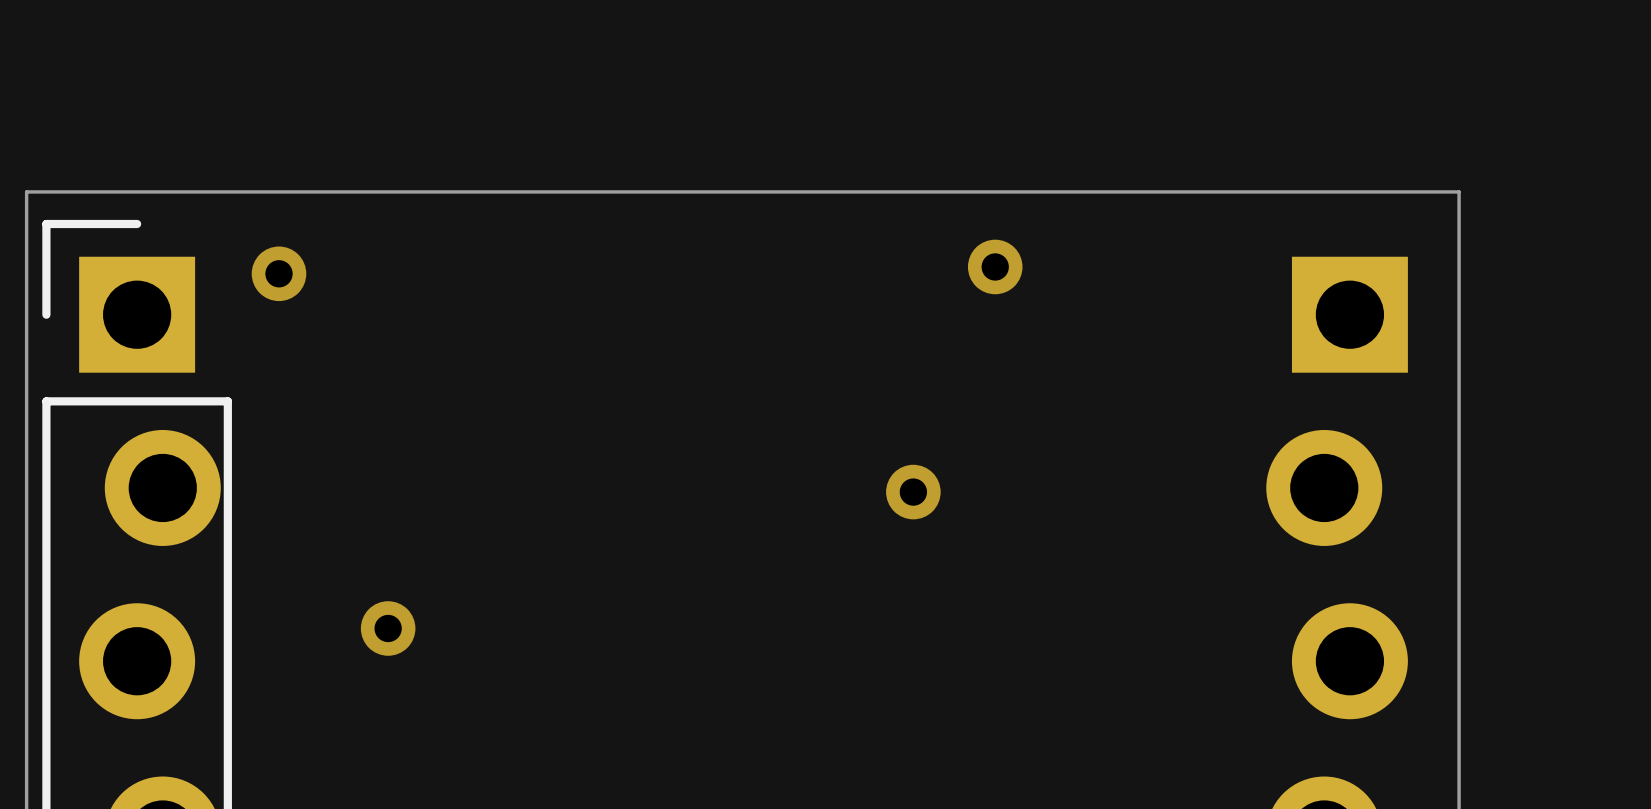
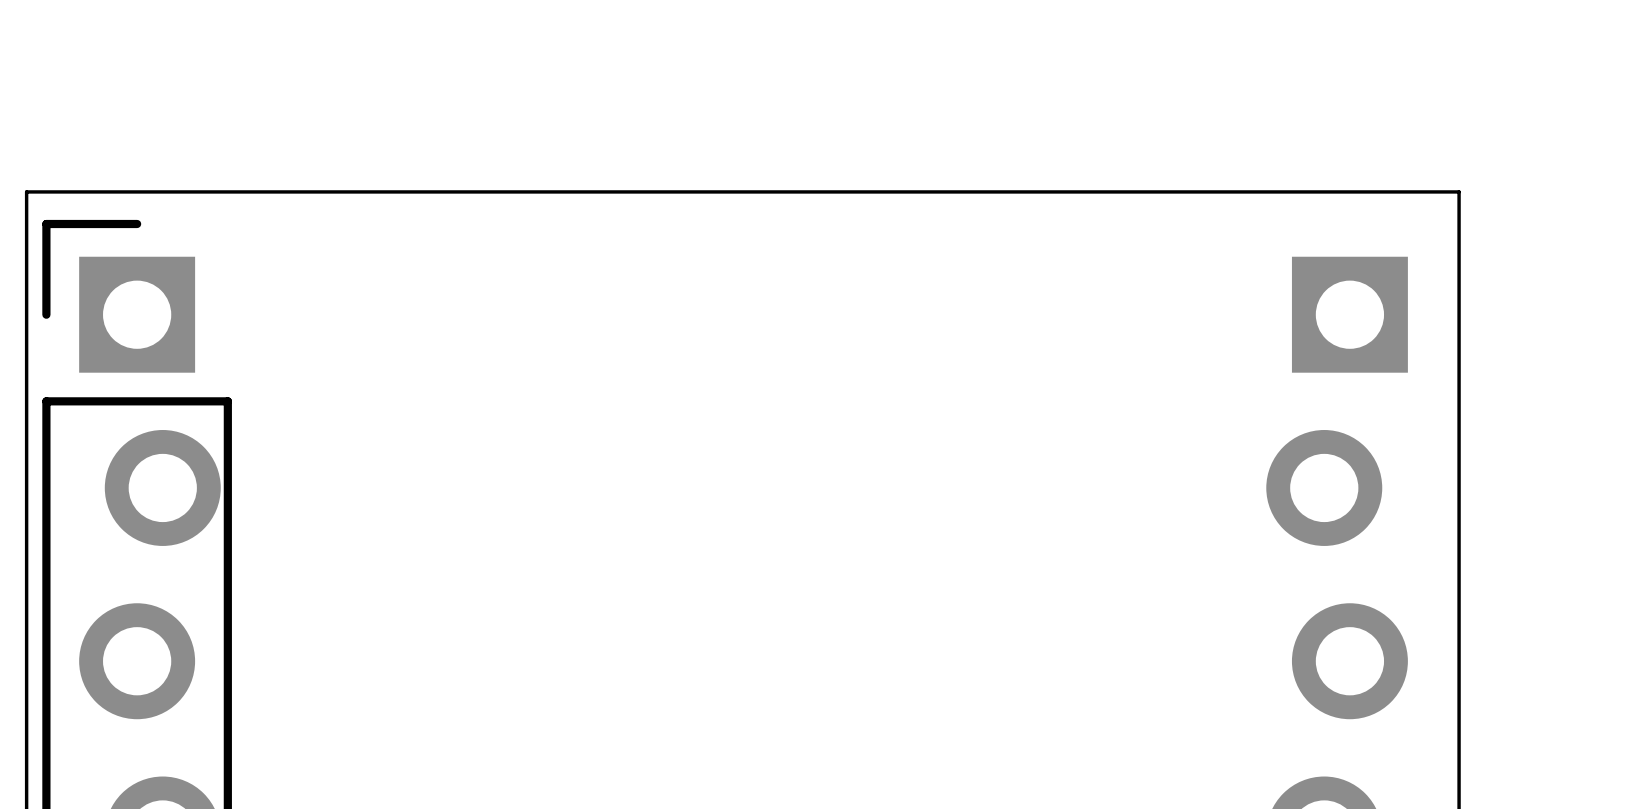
via: (995, 266) -> none
via: (279, 273) -> none
via: (913, 492) -> none
via: (388, 628) -> none

